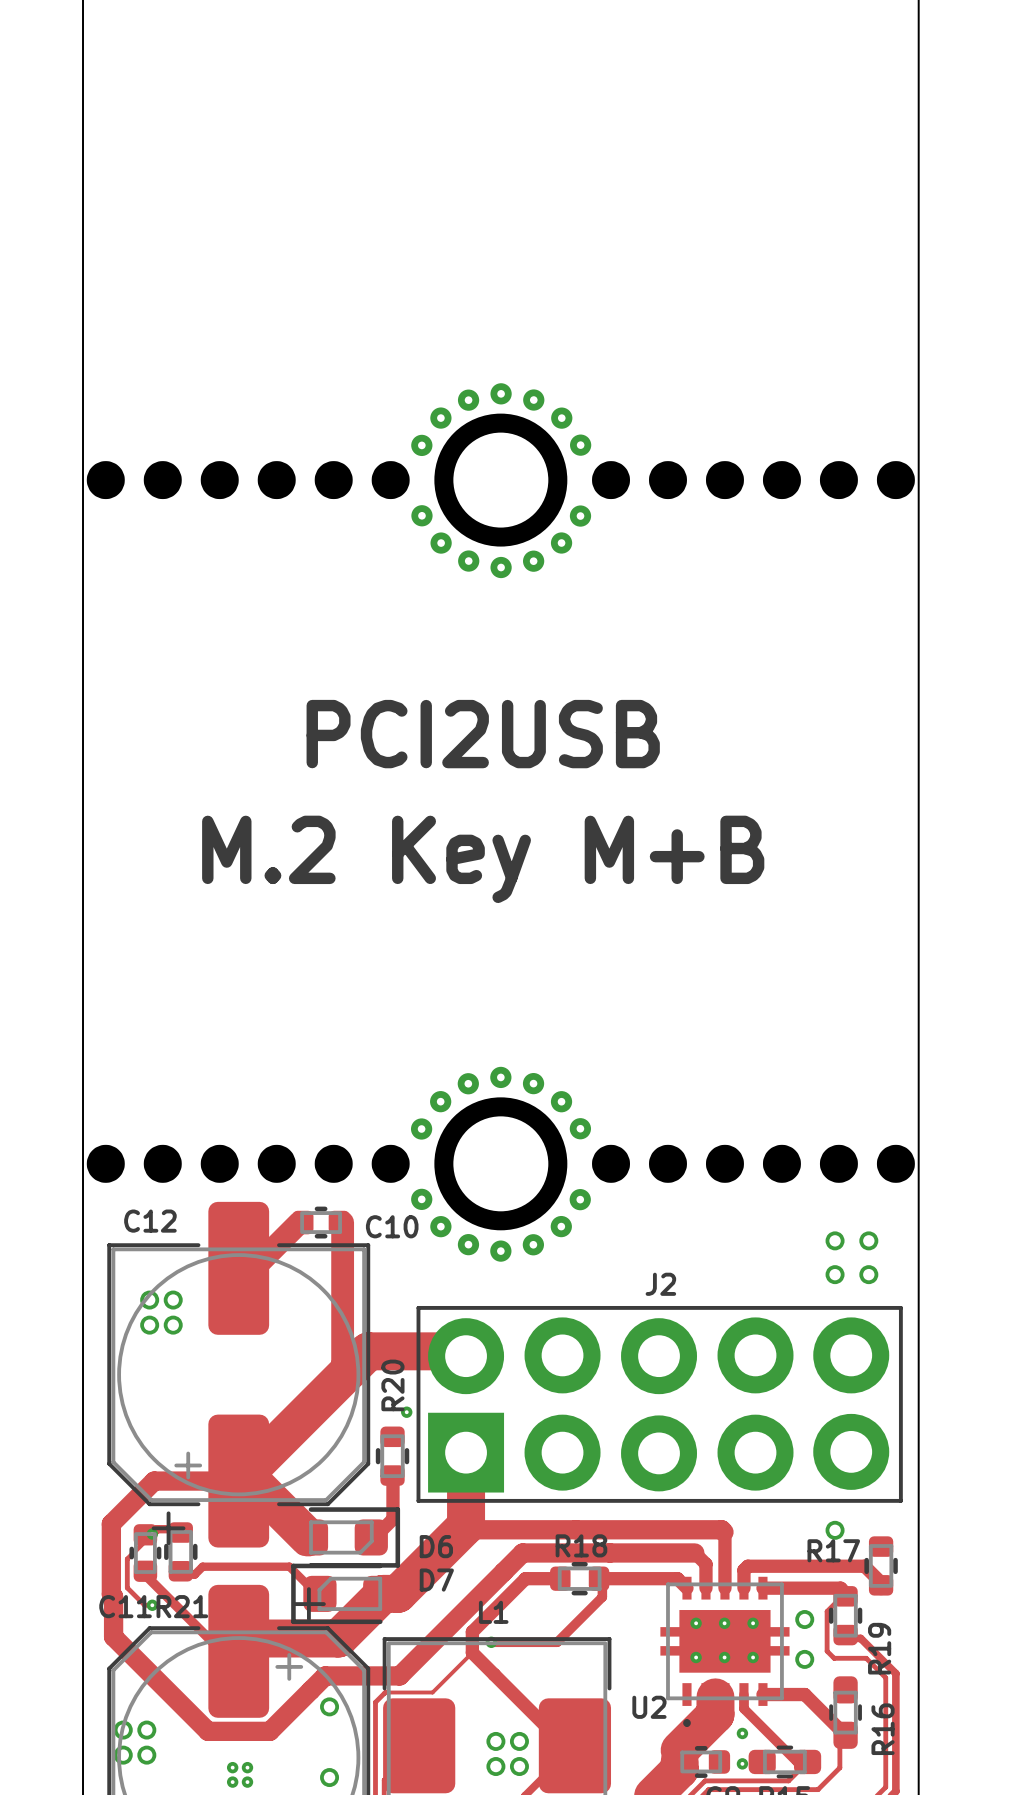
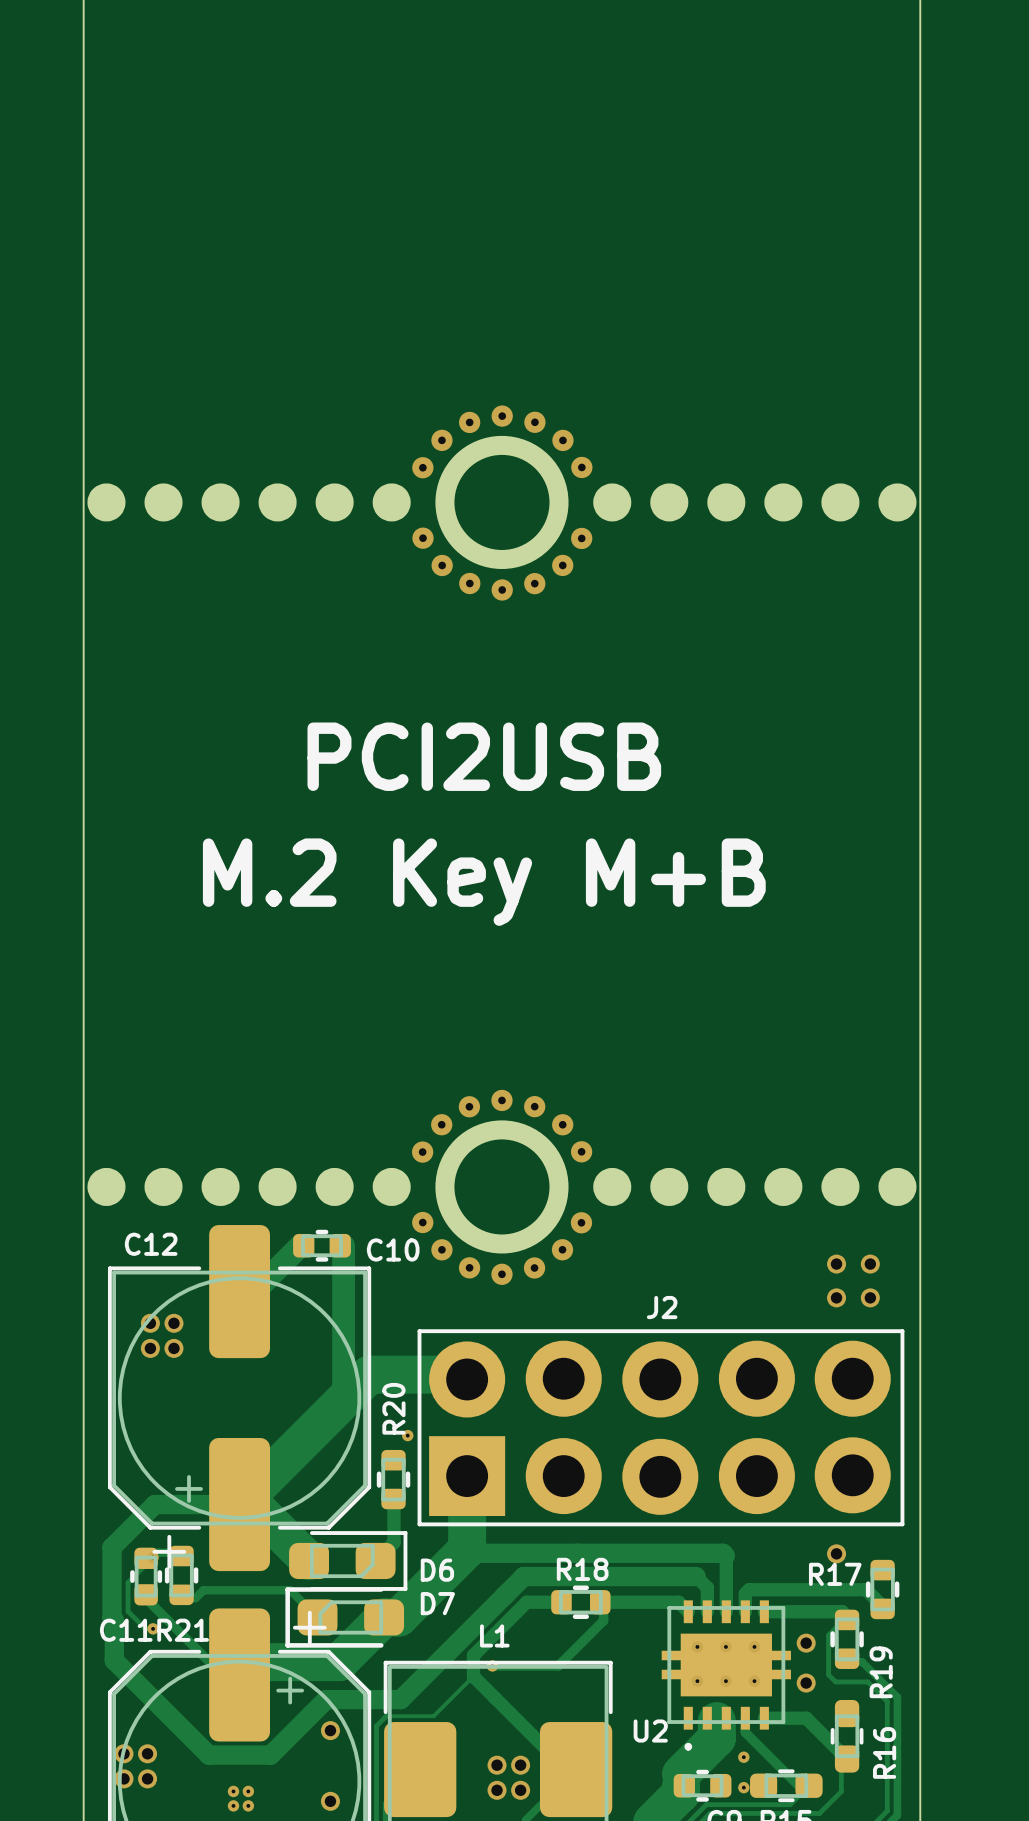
D6 footprint: [294, 1507, 401, 1568] -> [289, 1531, 408, 1591]
D7 footprint: [291, 1563, 397, 1625] -> [285, 1587, 405, 1648]

